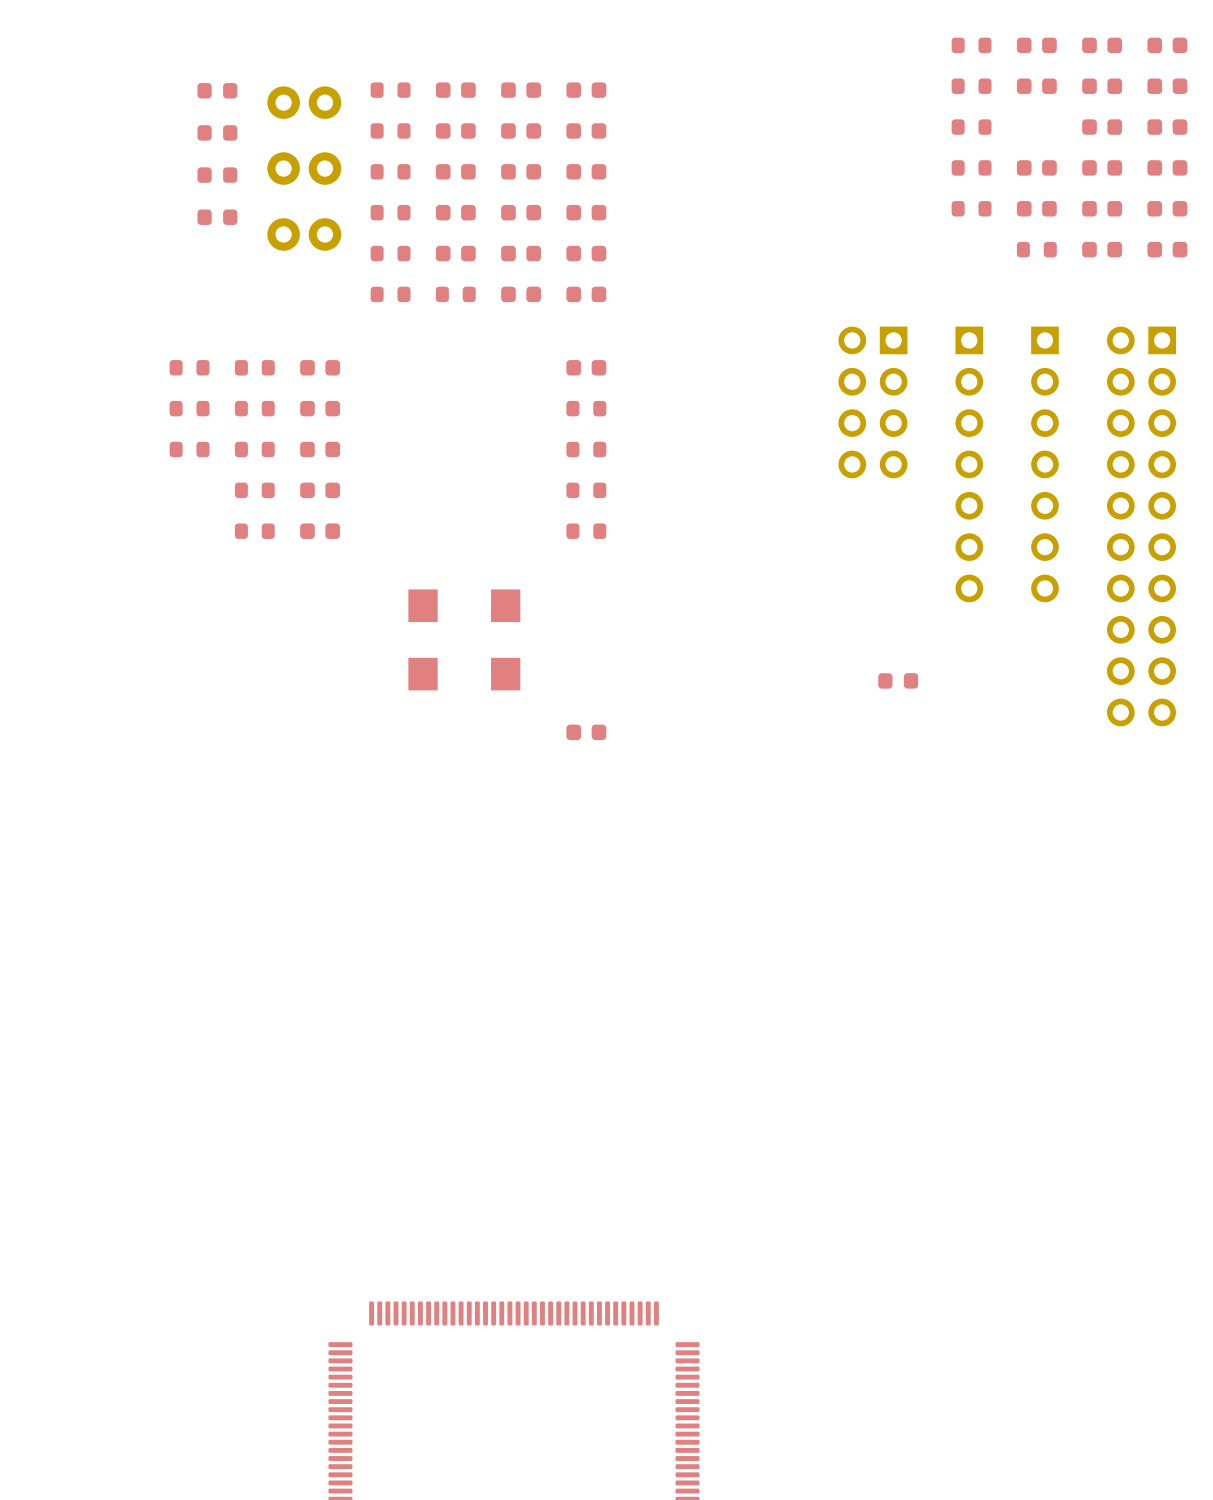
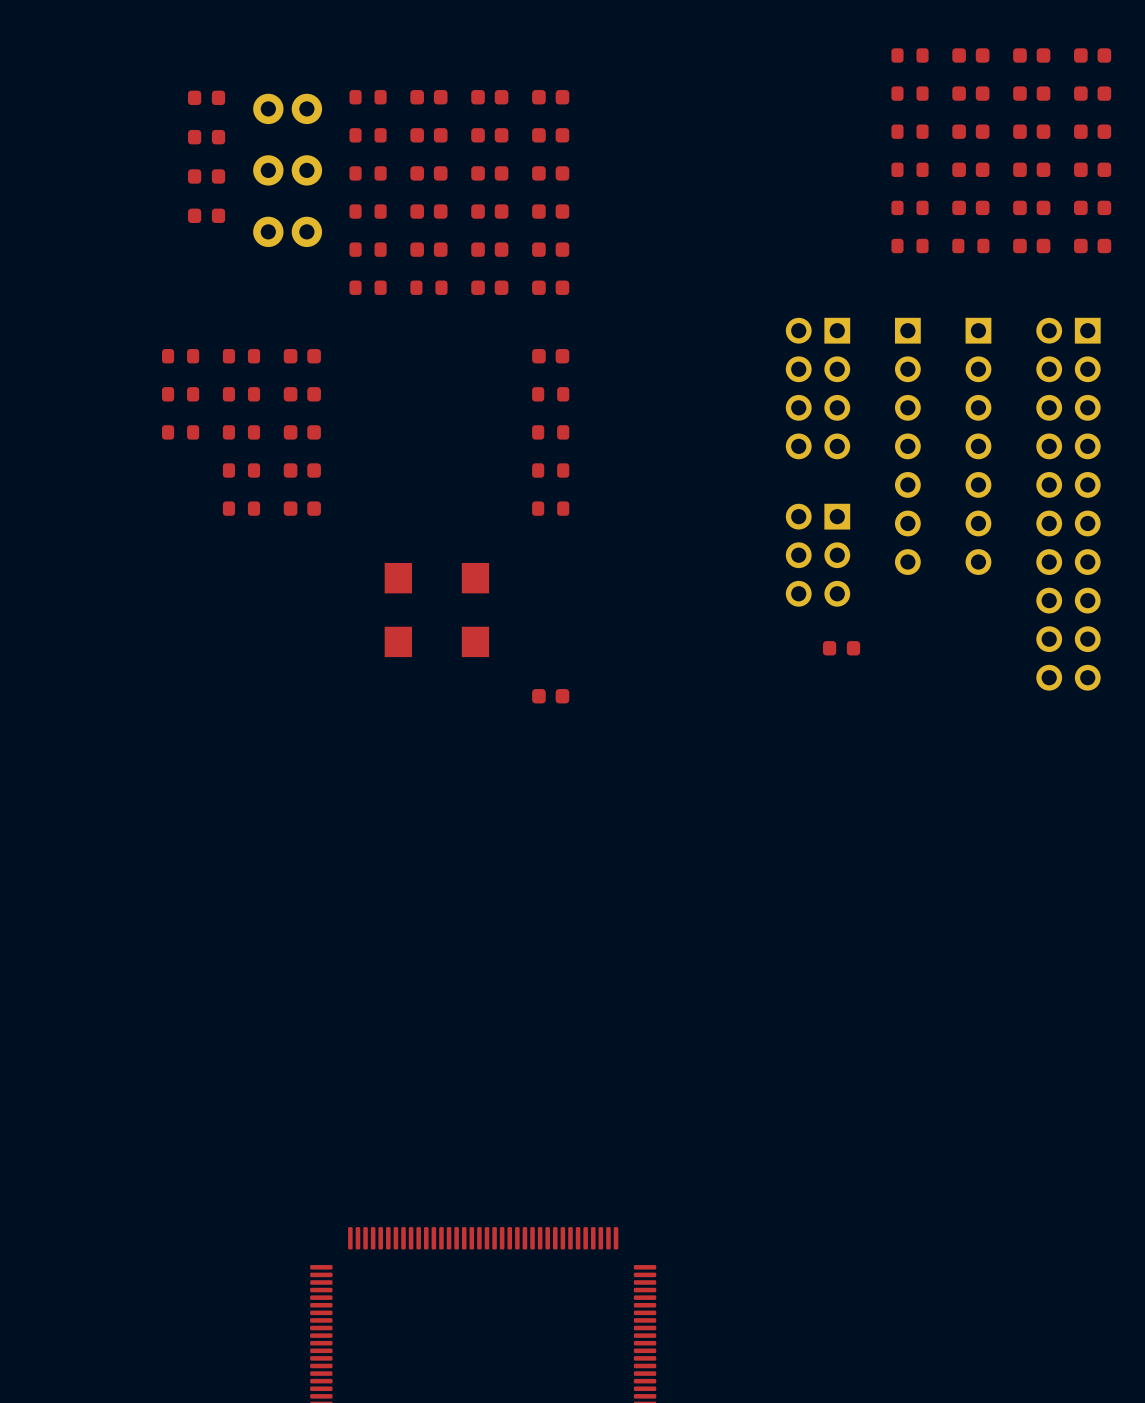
part: none -> (970, 131)
part: none -> (910, 245)
part: none -> (818, 555)

